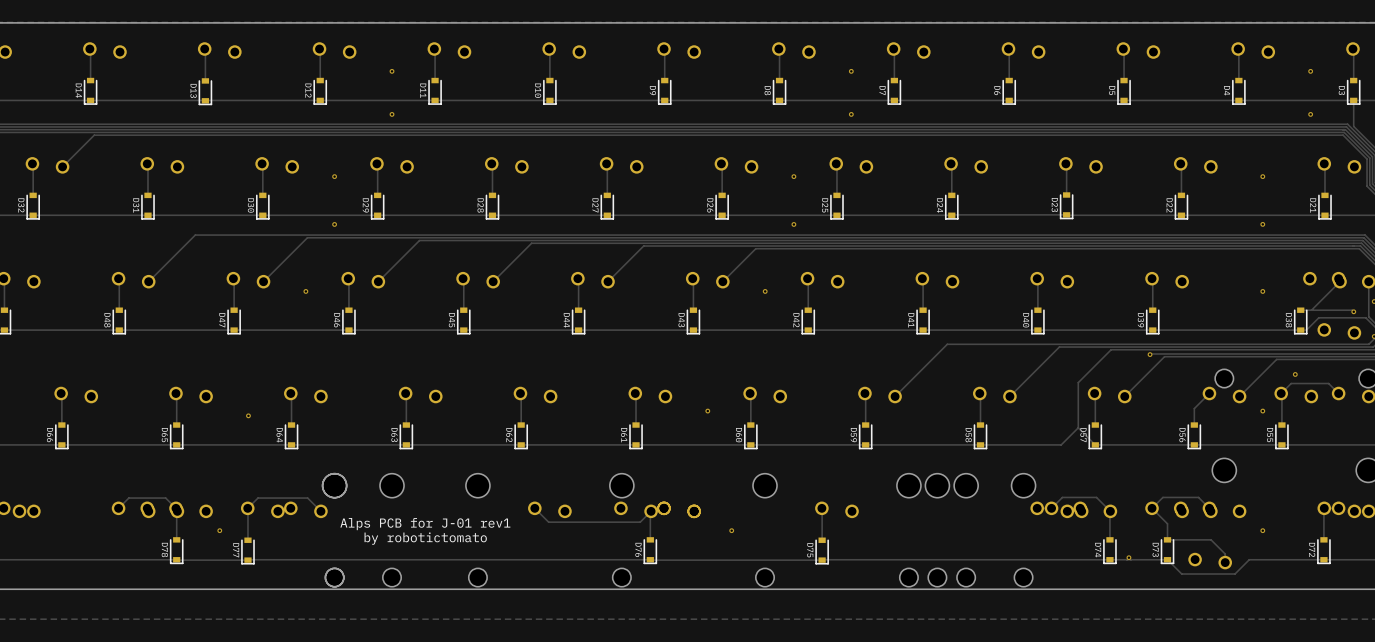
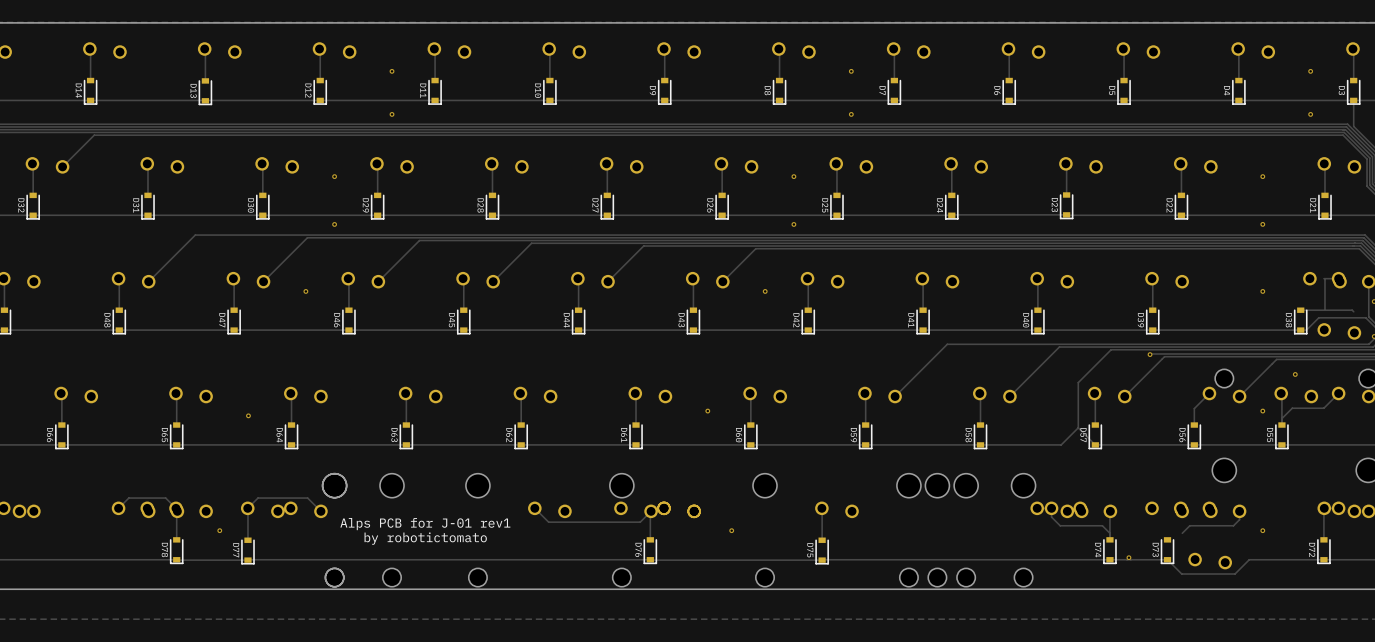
track: none -> (1337, 278) (1324, 278) (1324, 310)
track: (1338, 278) (1340, 281) (1311, 310) -> none
via: (1353, 311) -> none
track: (1338, 393) (1328, 383) (1291, 383) (1281, 393) -> (1338, 393) (1323, 408) (1292, 408) (1281, 418)
track: (1051, 508) (1062, 497) (1096, 497) (1110, 511) -> (1051, 508) (1051, 517) (1060, 525) (1102, 525) (1109, 533)
track: (1209, 508) (1198, 497) (1162, 497) (1152, 508) (1167, 523) (1167, 539) (1211, 539) (1225, 554) (1225, 562) -> none
track: none -> (1239, 511) (1239, 519) (1233, 525) (1189, 525) (1182, 533)

